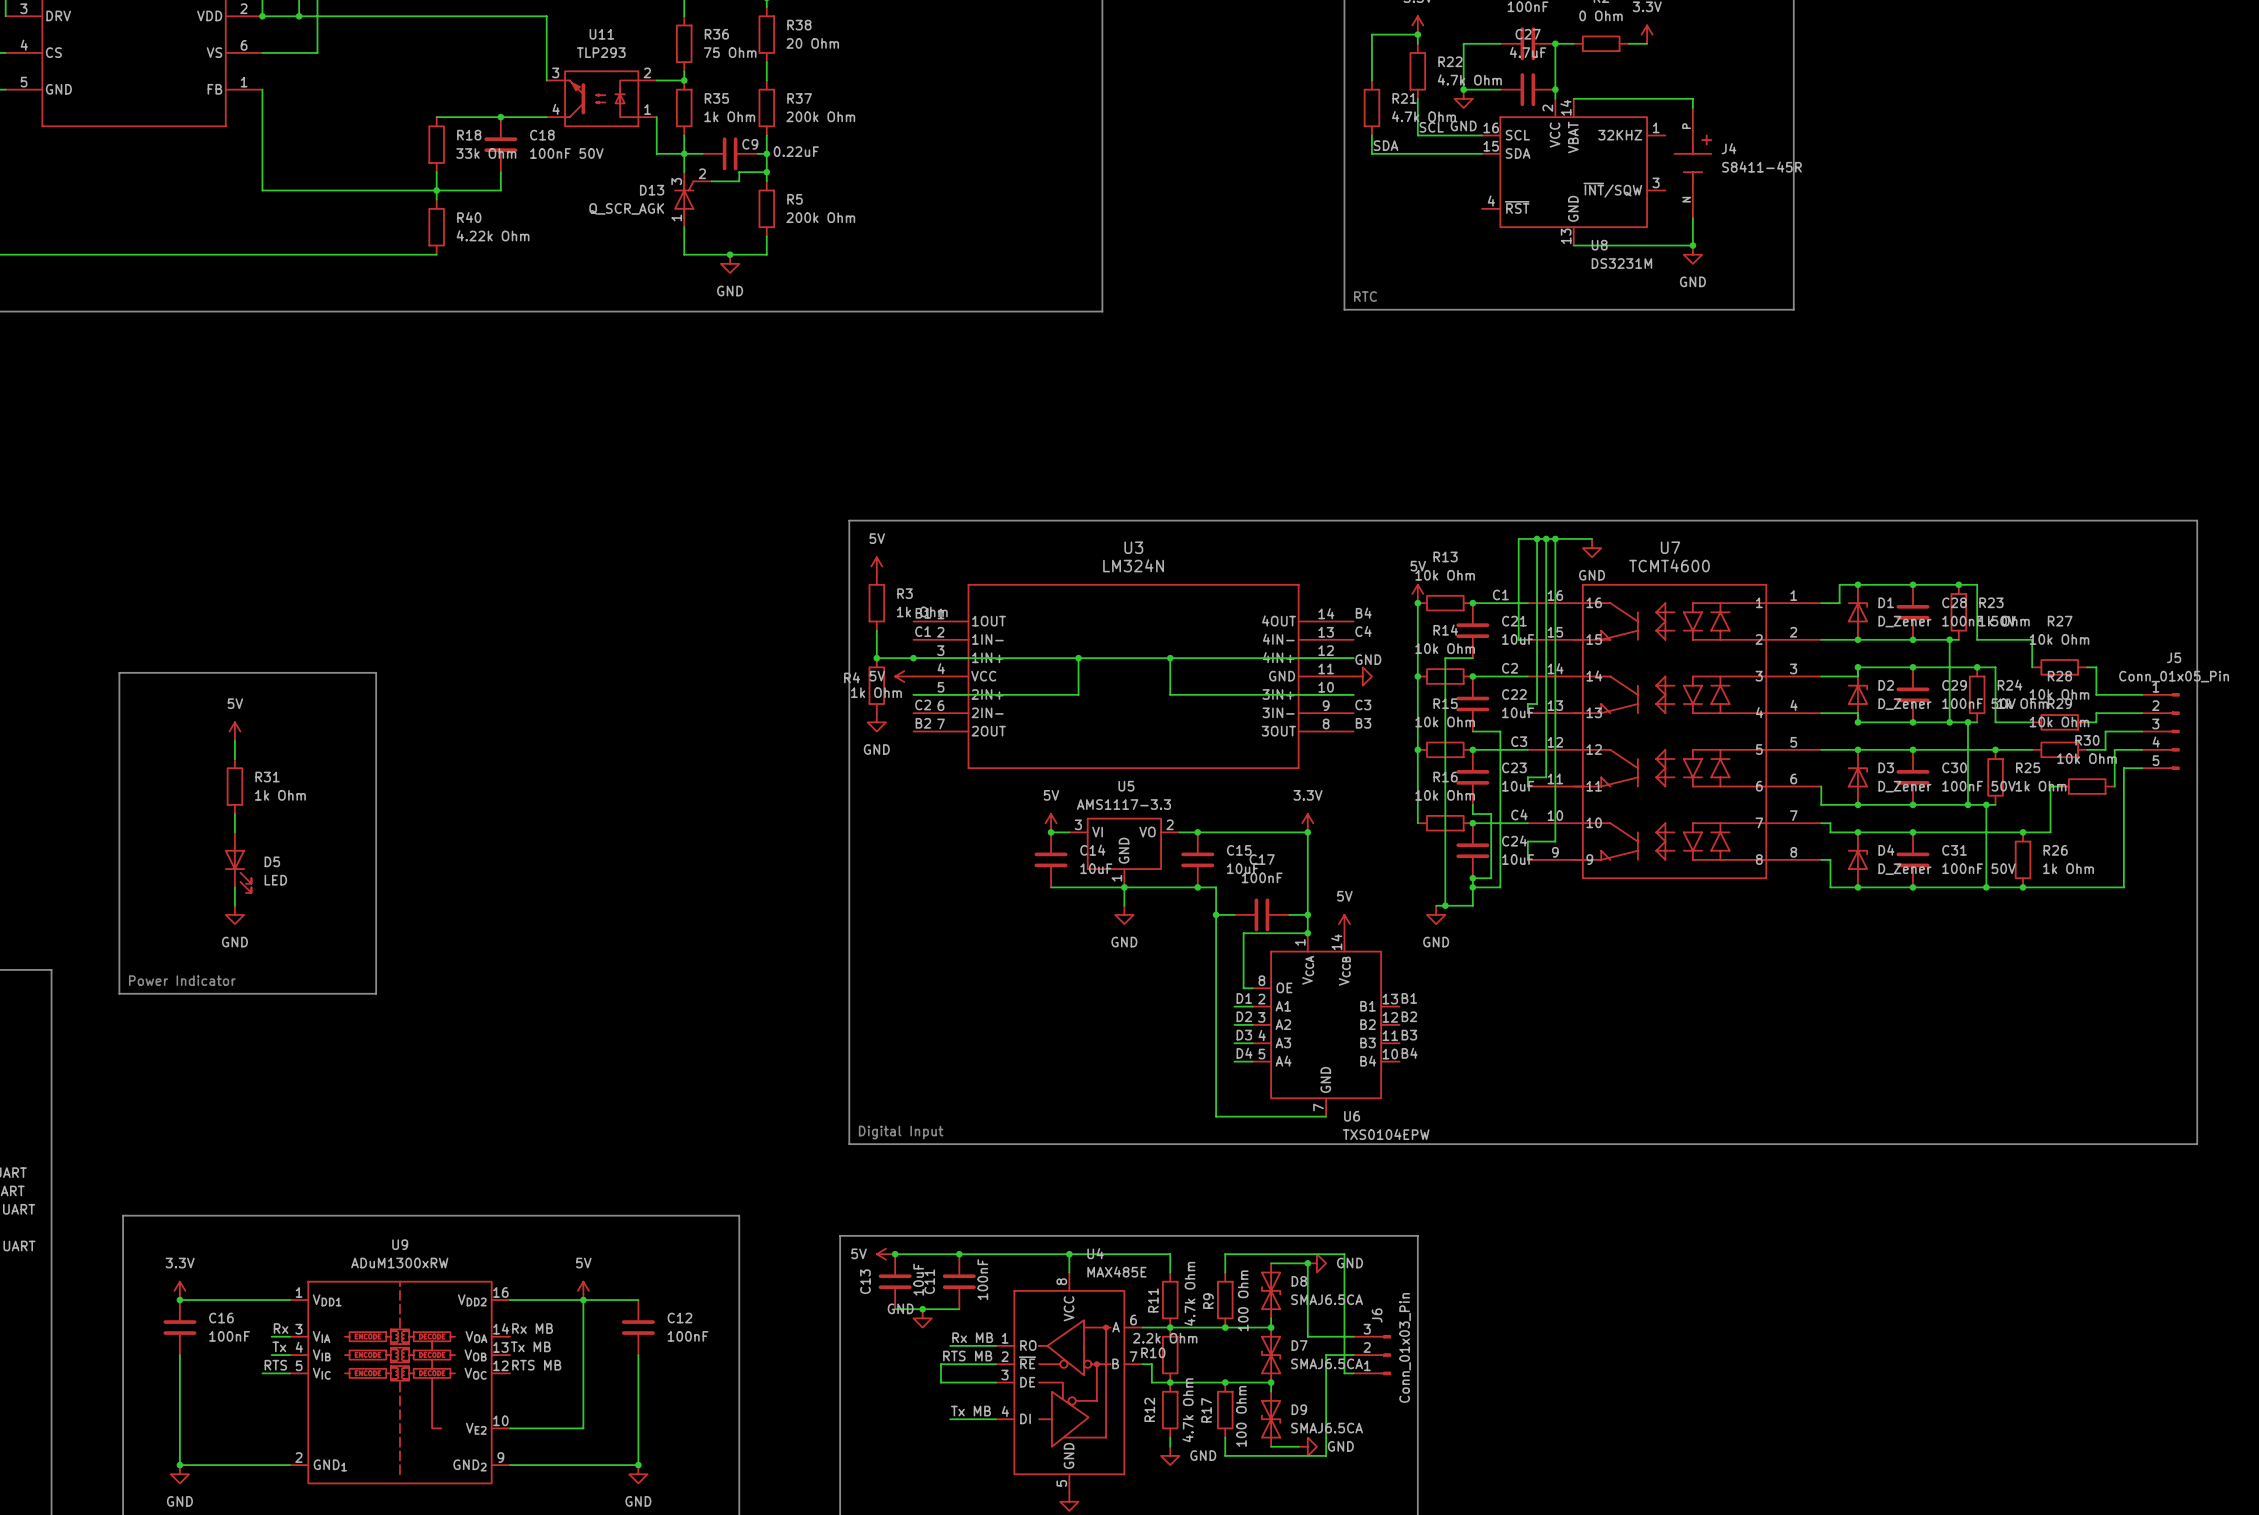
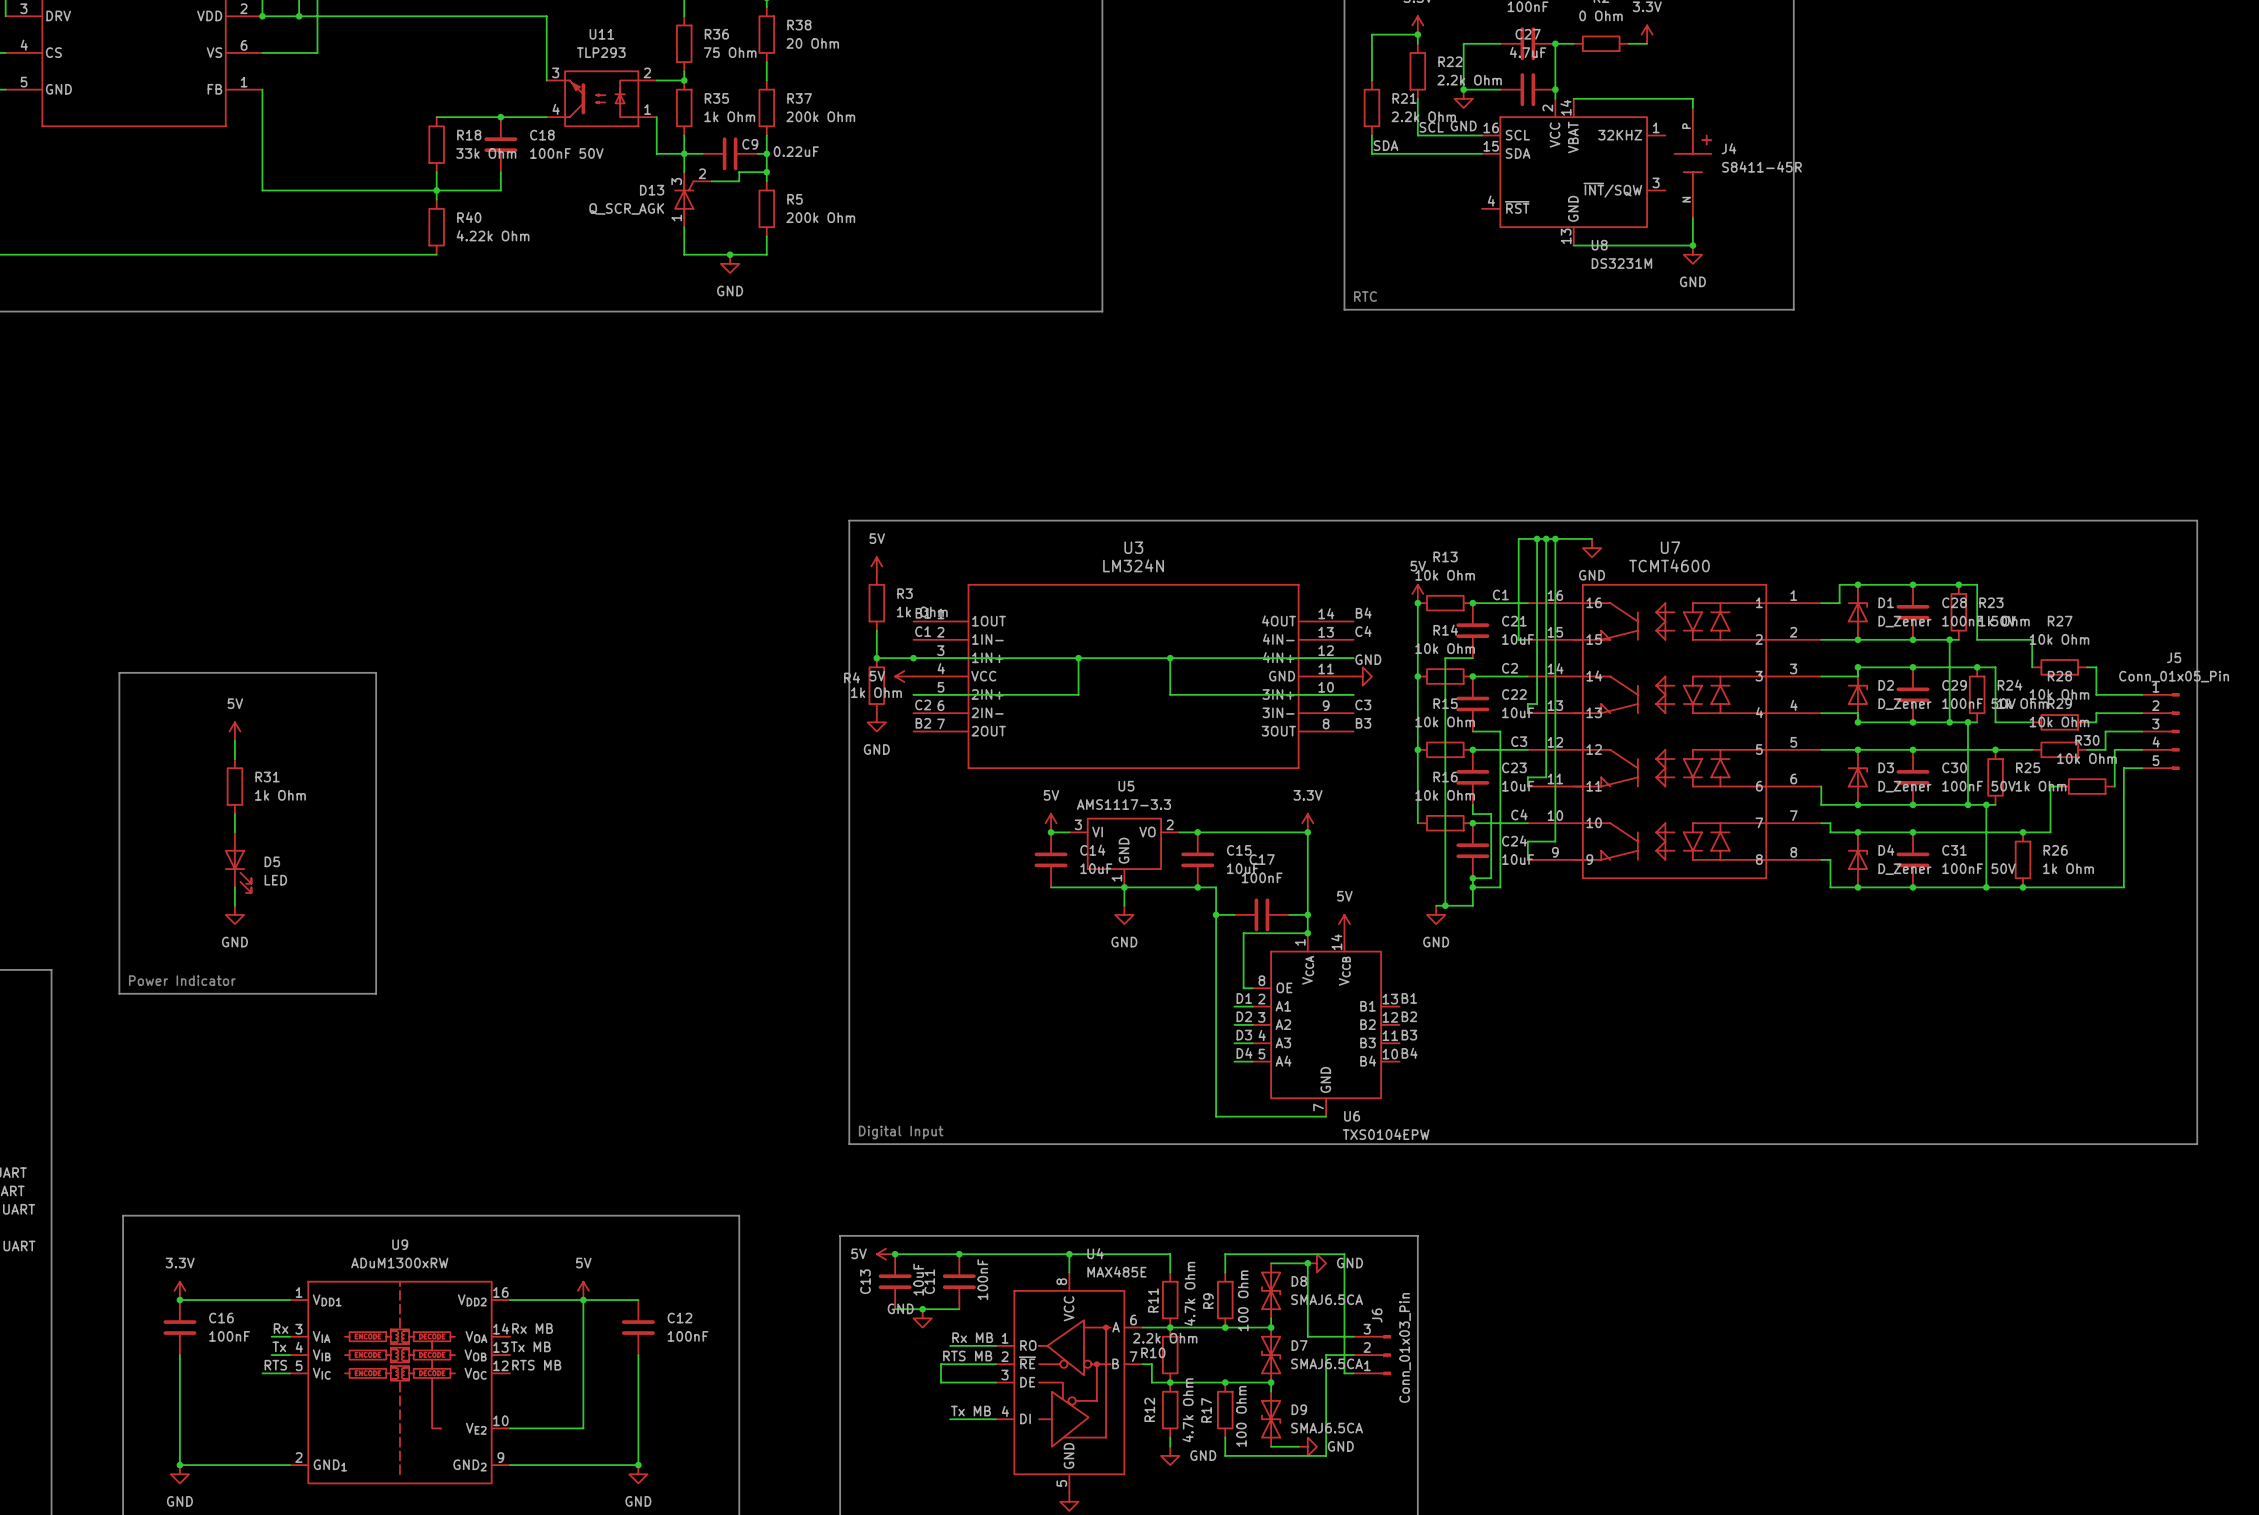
R22 value: 4.7k Ohm (1469, 79) -> 2.2k Ohm (1469, 80)
R21 value: 4.7k Ohm (1424, 116) -> 2.2k Ohm (1423, 116)

